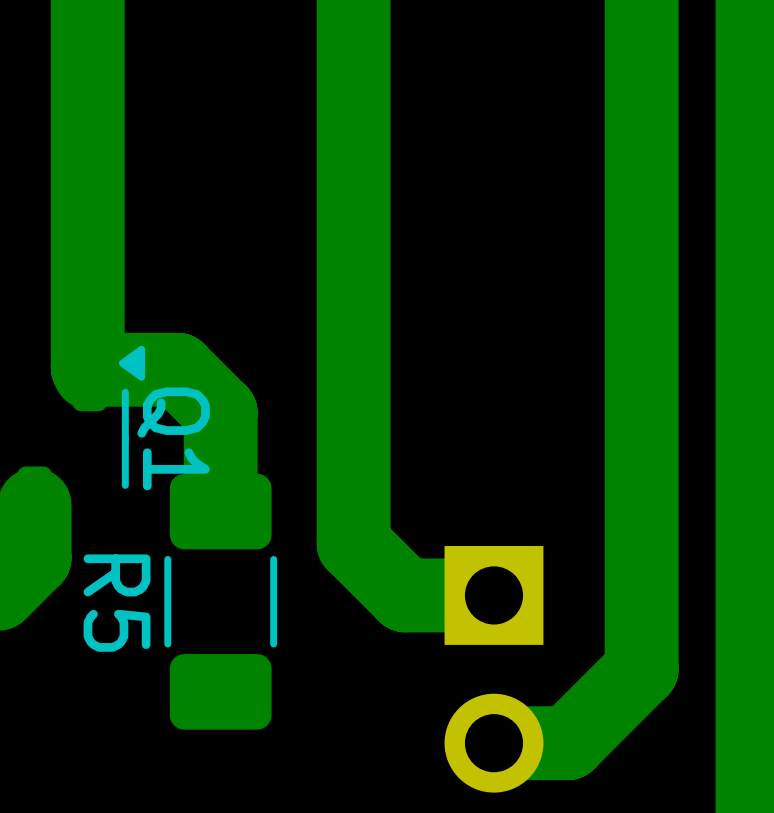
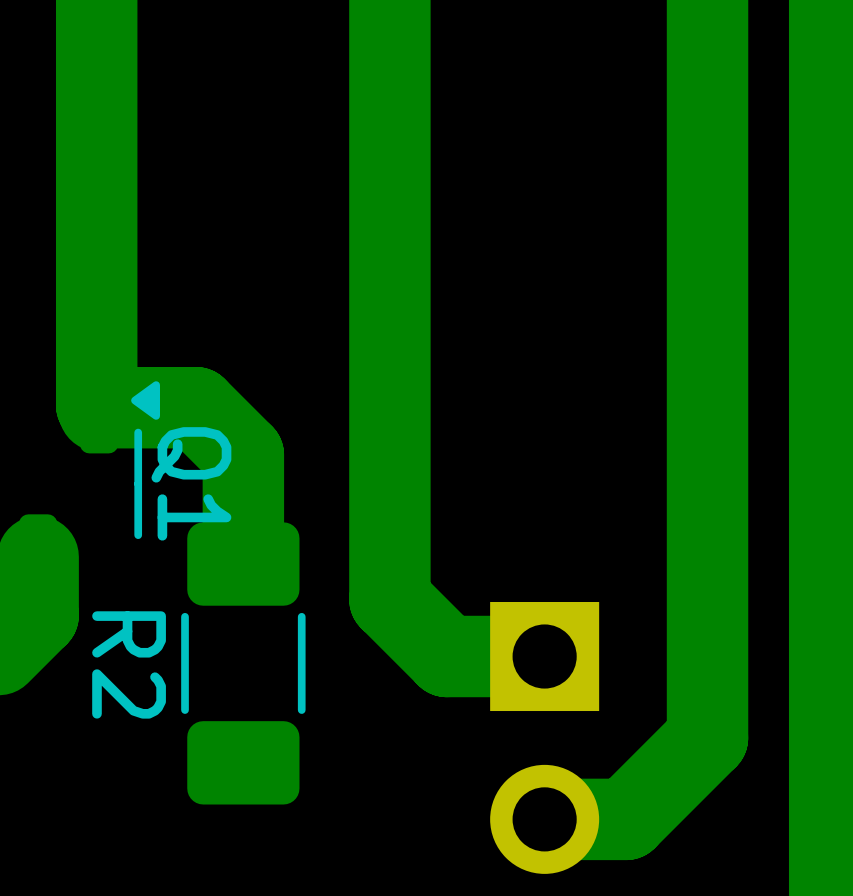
R5 name: R5 (117, 603) -> R2 (129, 664)

